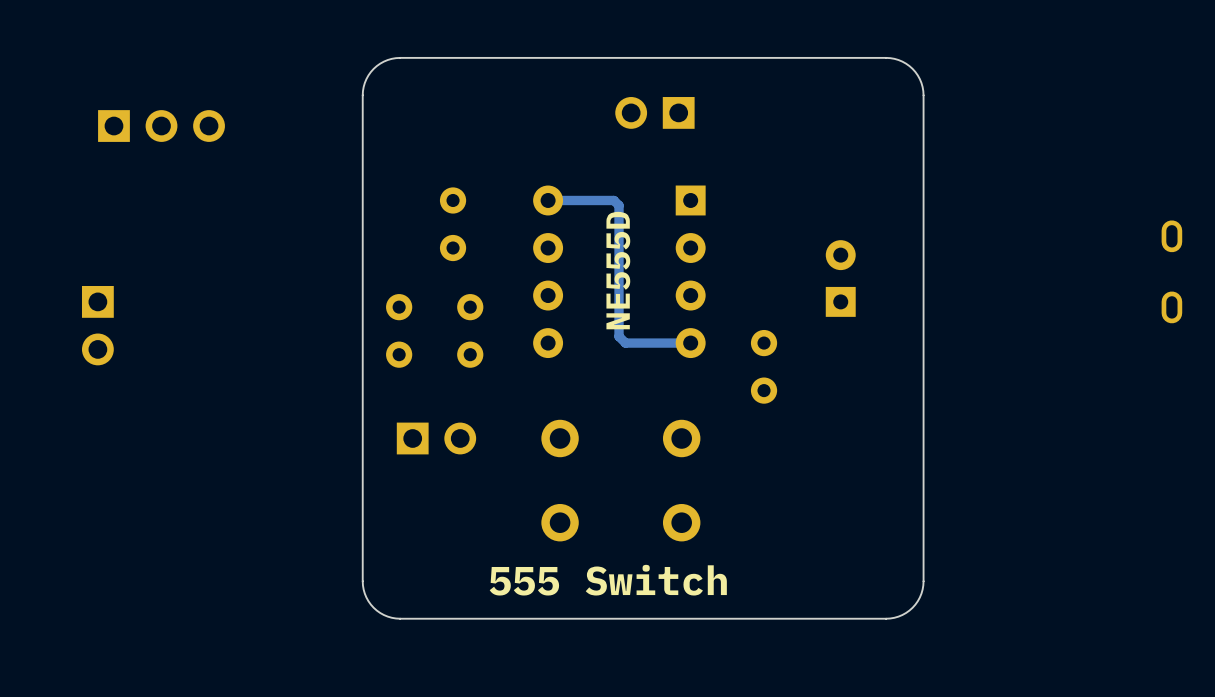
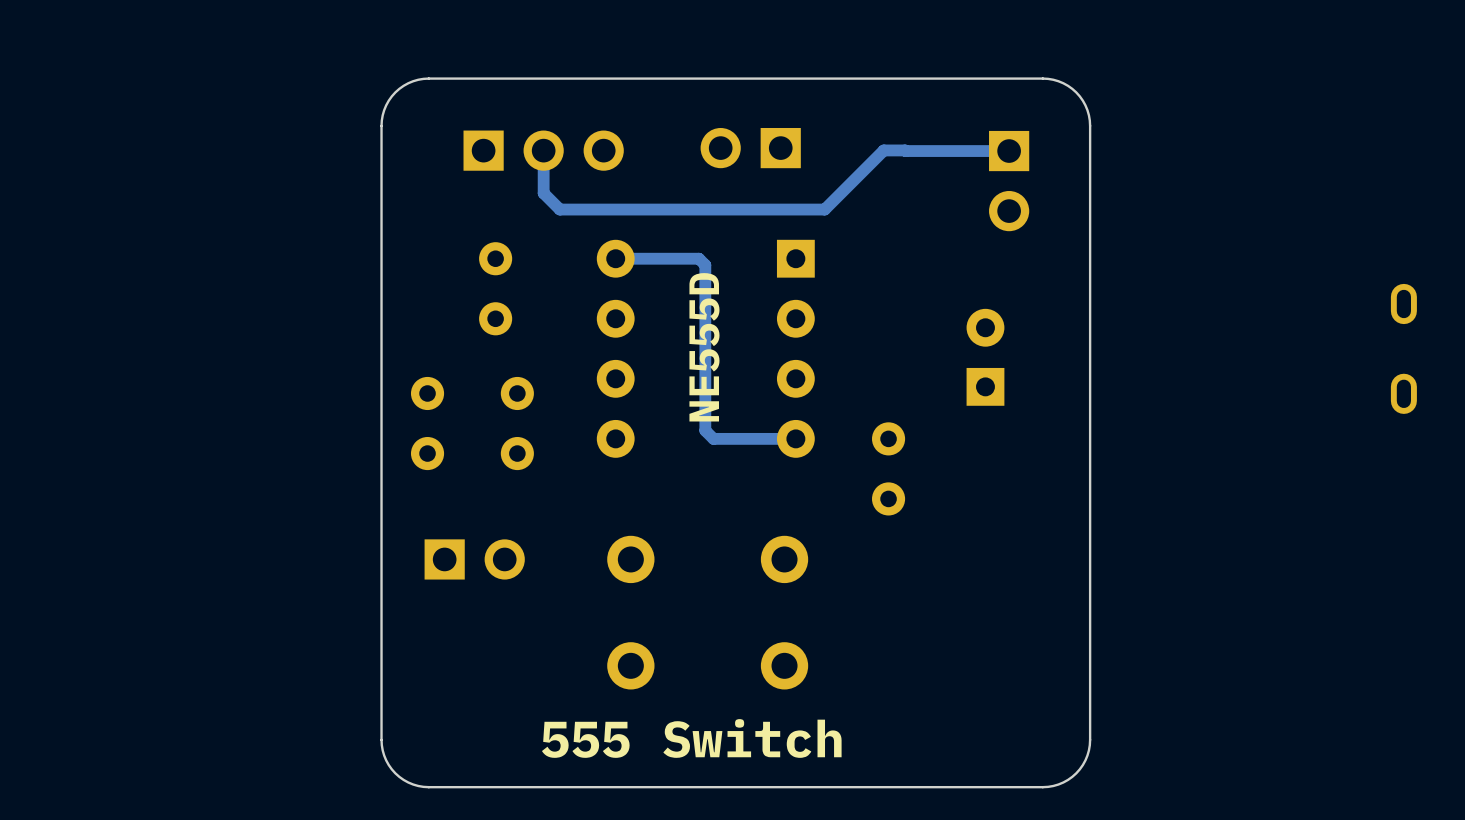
track: none -> (543, 150) (543, 193) (559, 209) (824, 209) (883, 150) (1009, 151)
part position: (161, 126) -> (543, 150)
part: none -> (1009, 181)
part: (97, 325) -> none

